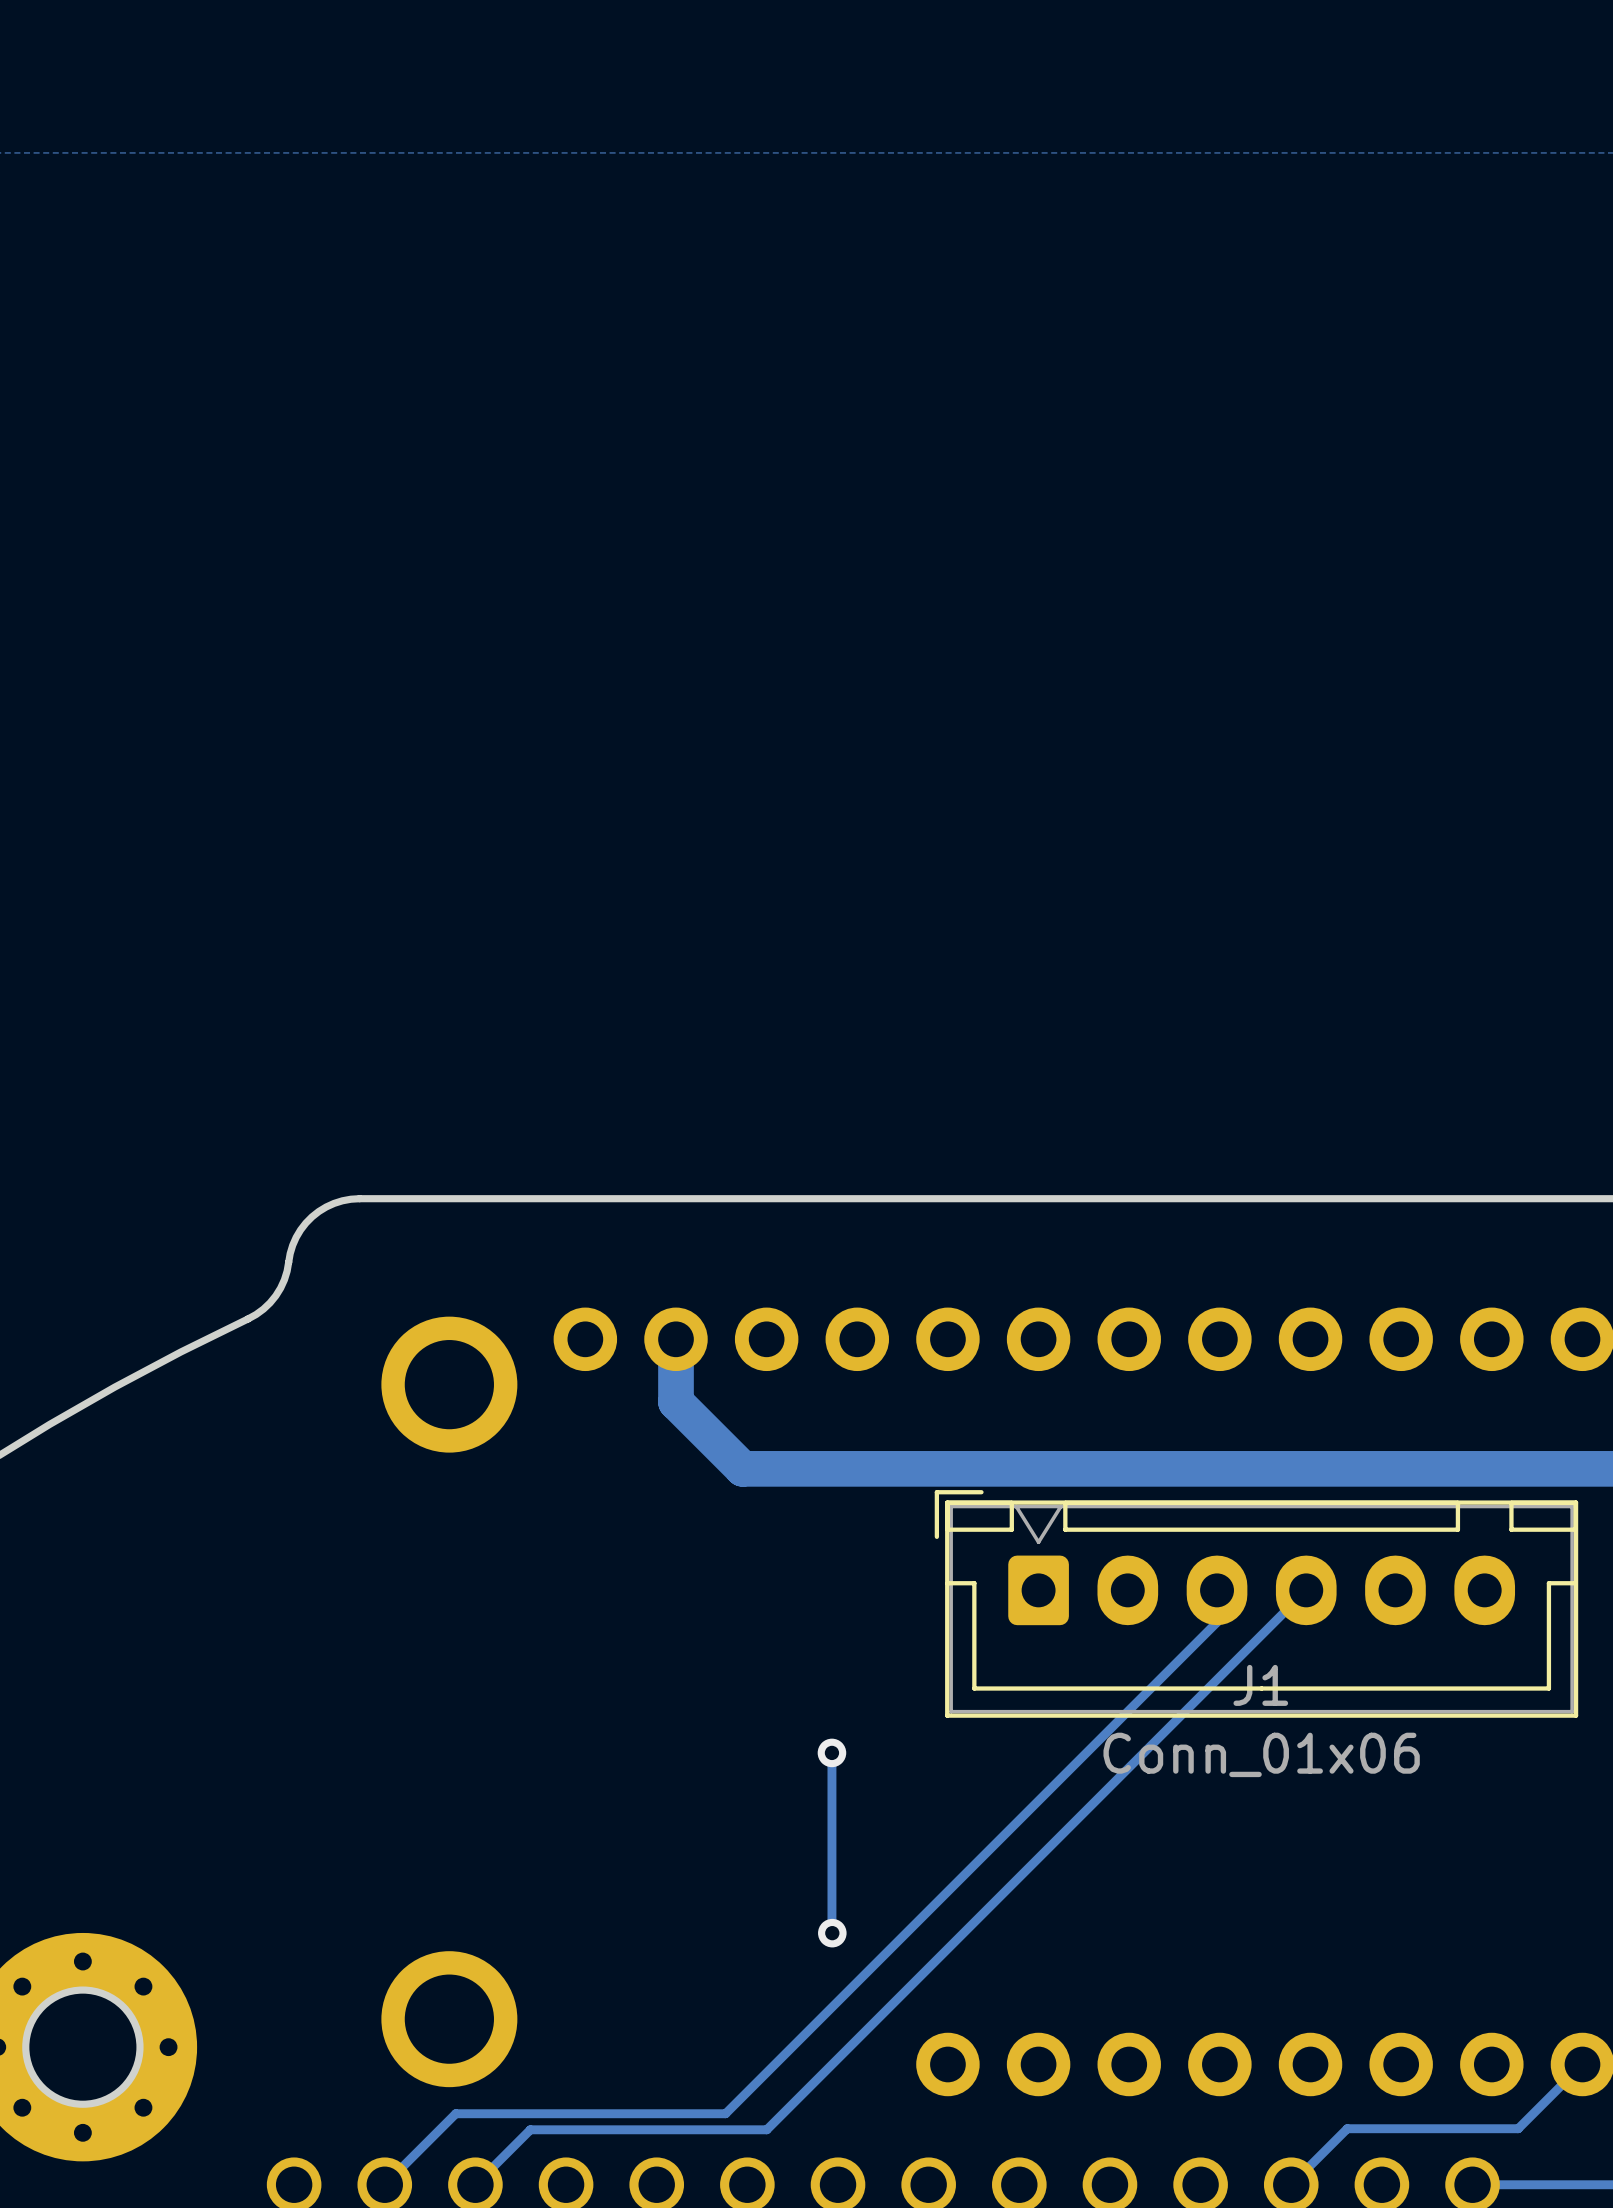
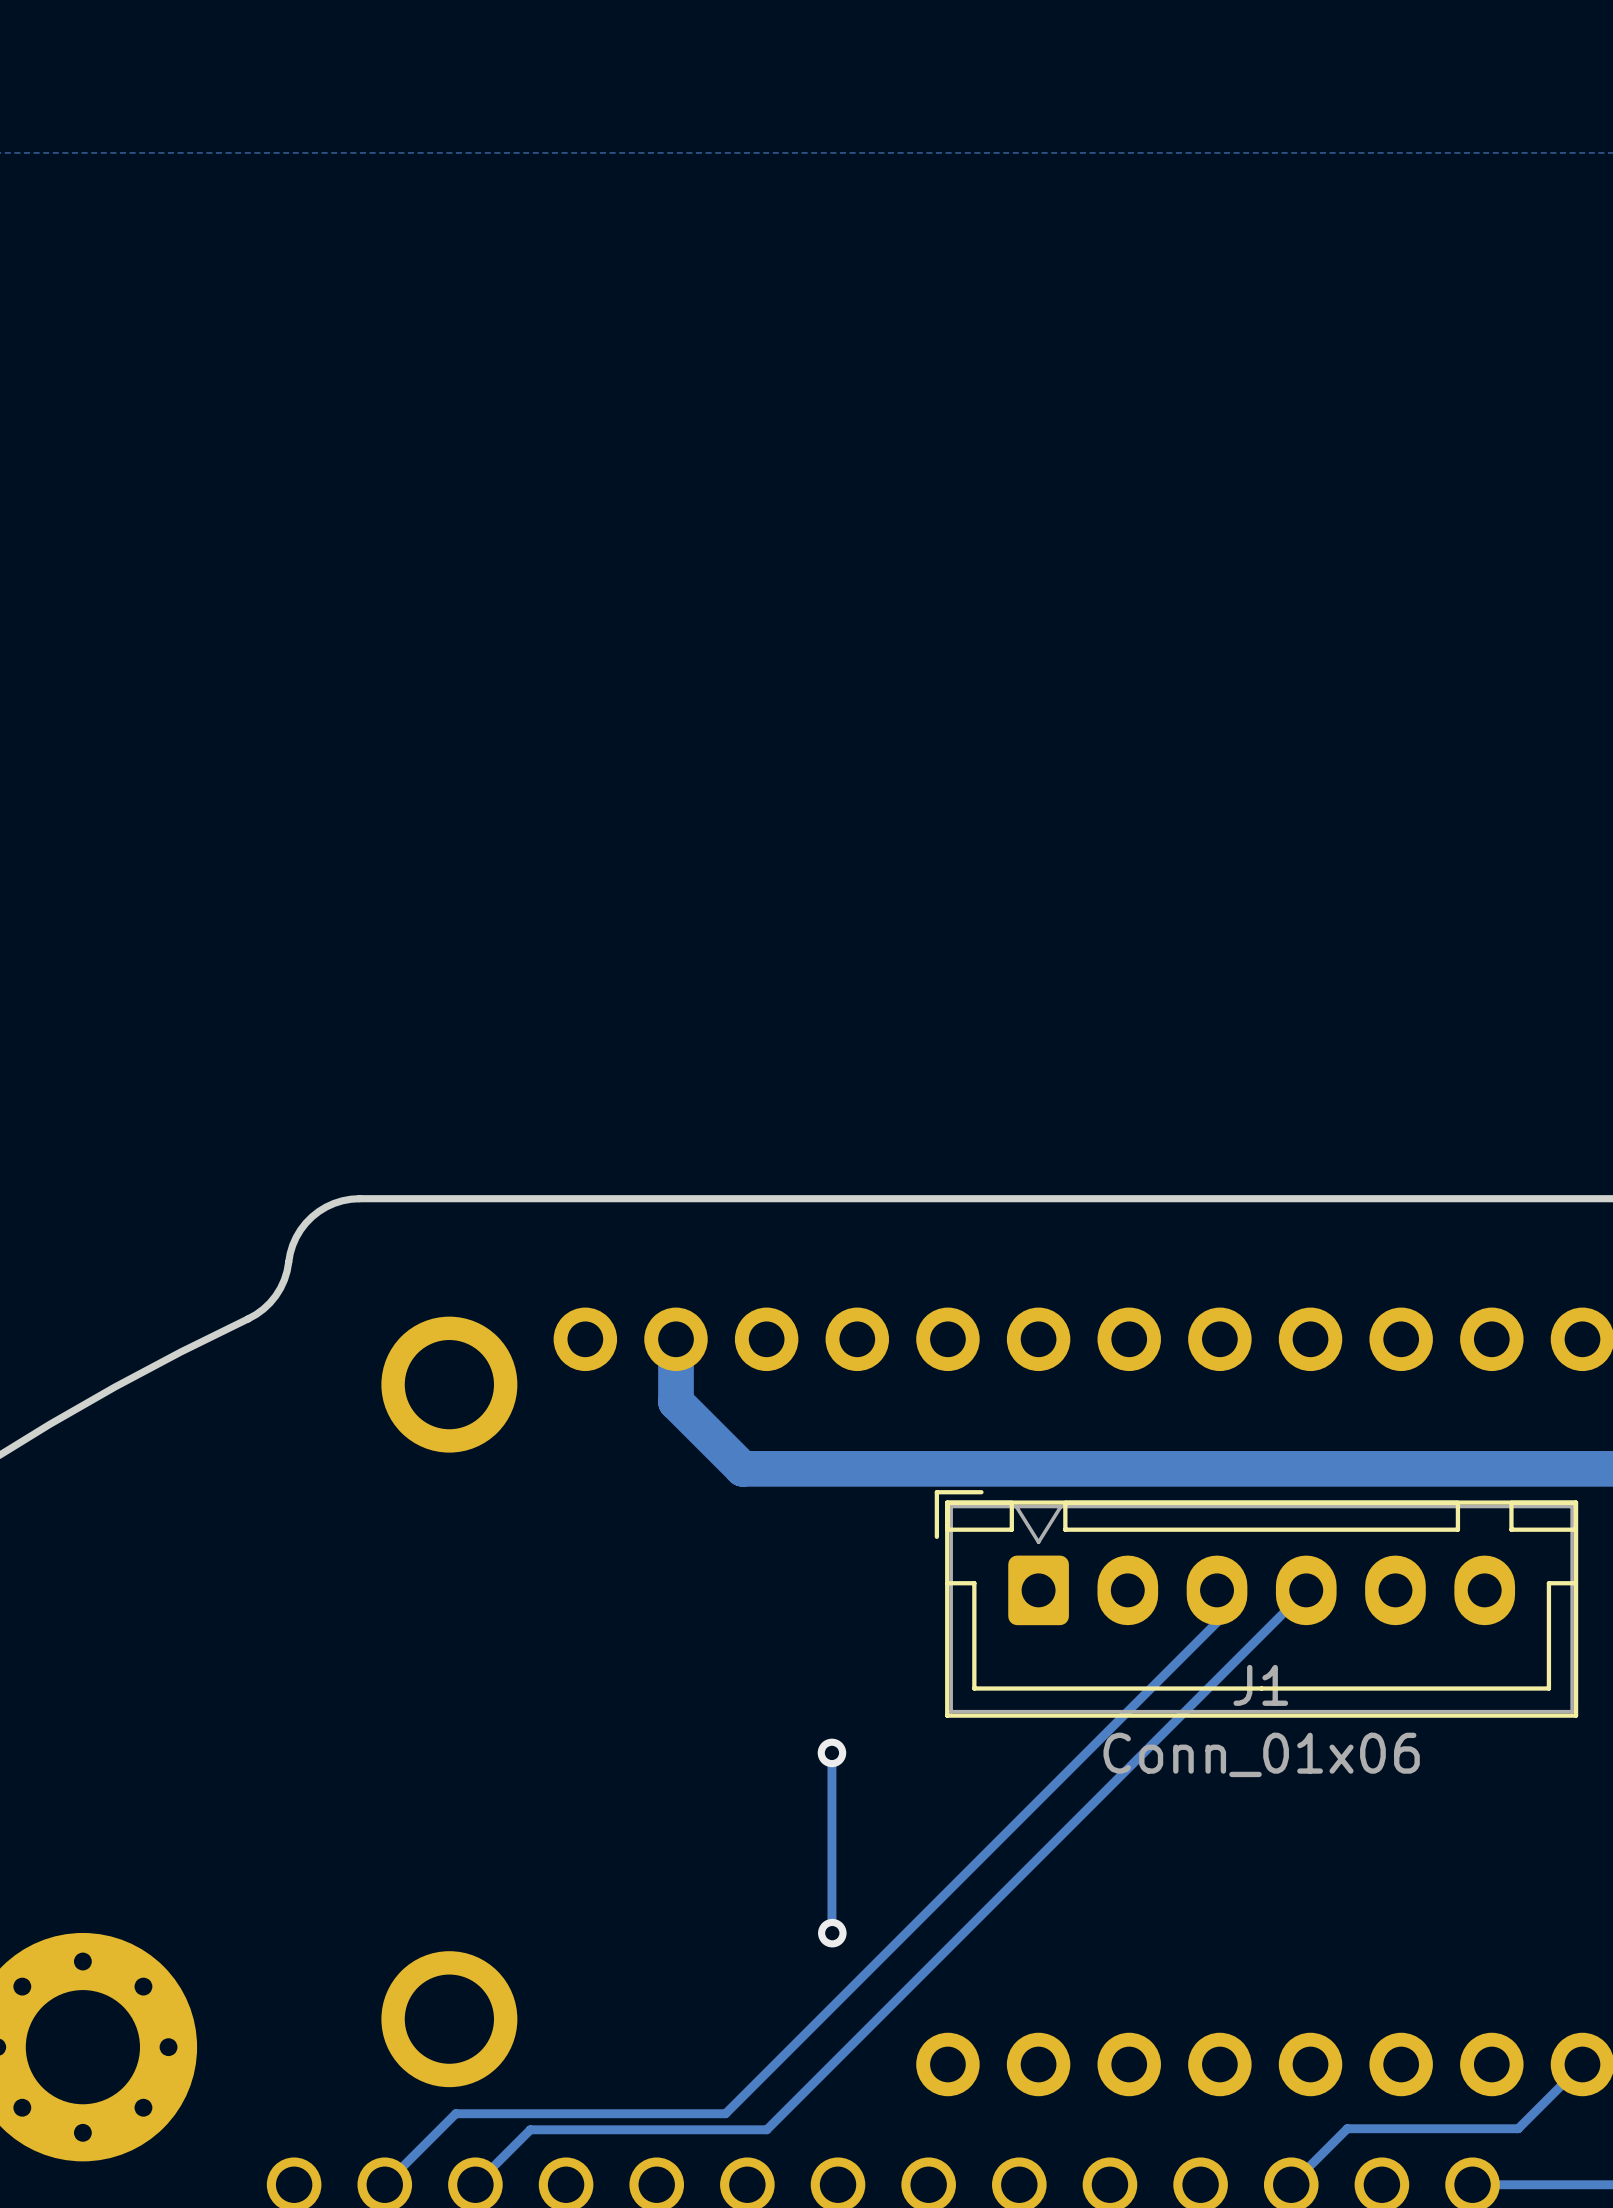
round board edge: [22, 1986, 144, 2108] -> none

